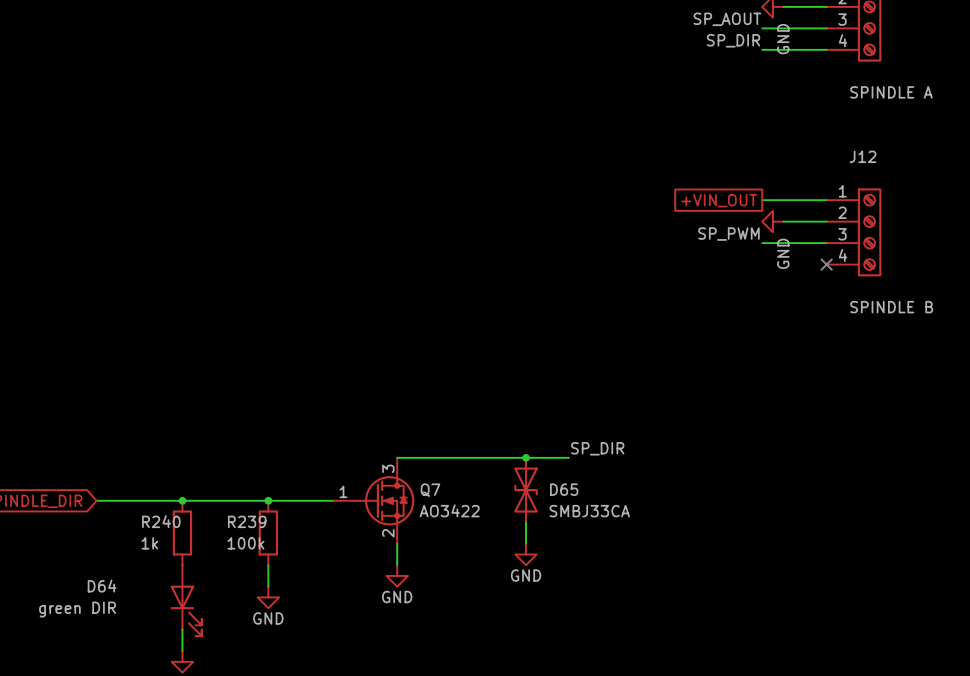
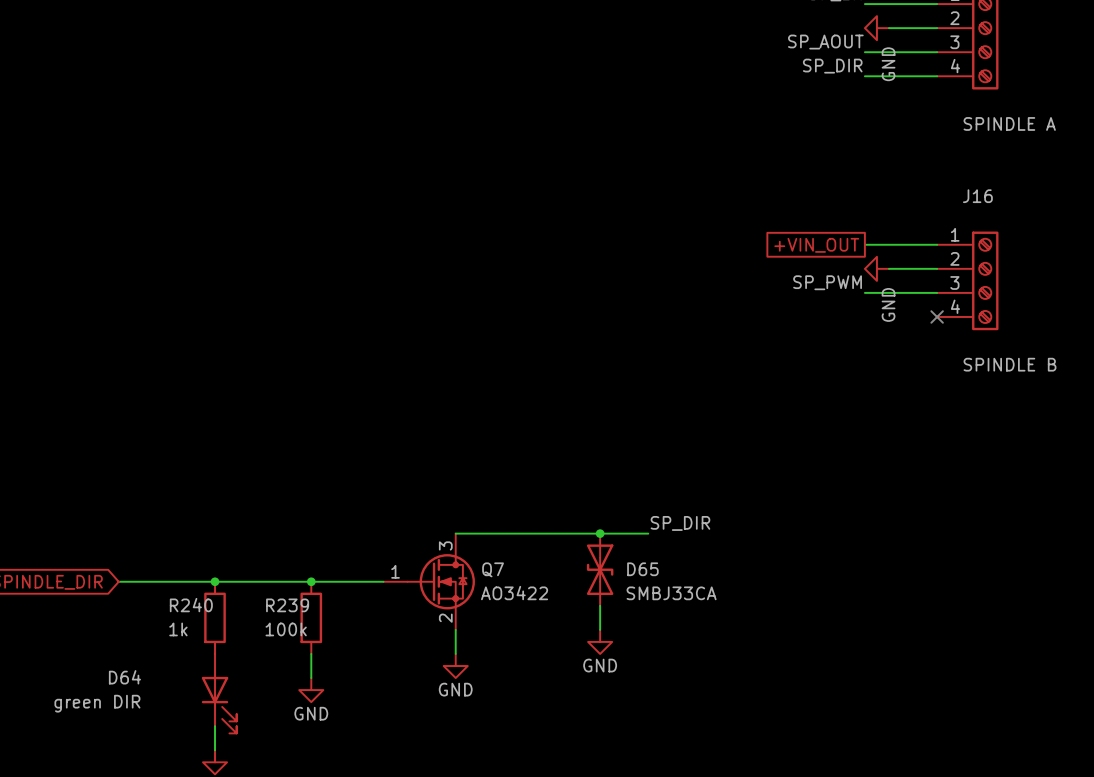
J12 name: J12 (863, 156) -> J16 (977, 196)

